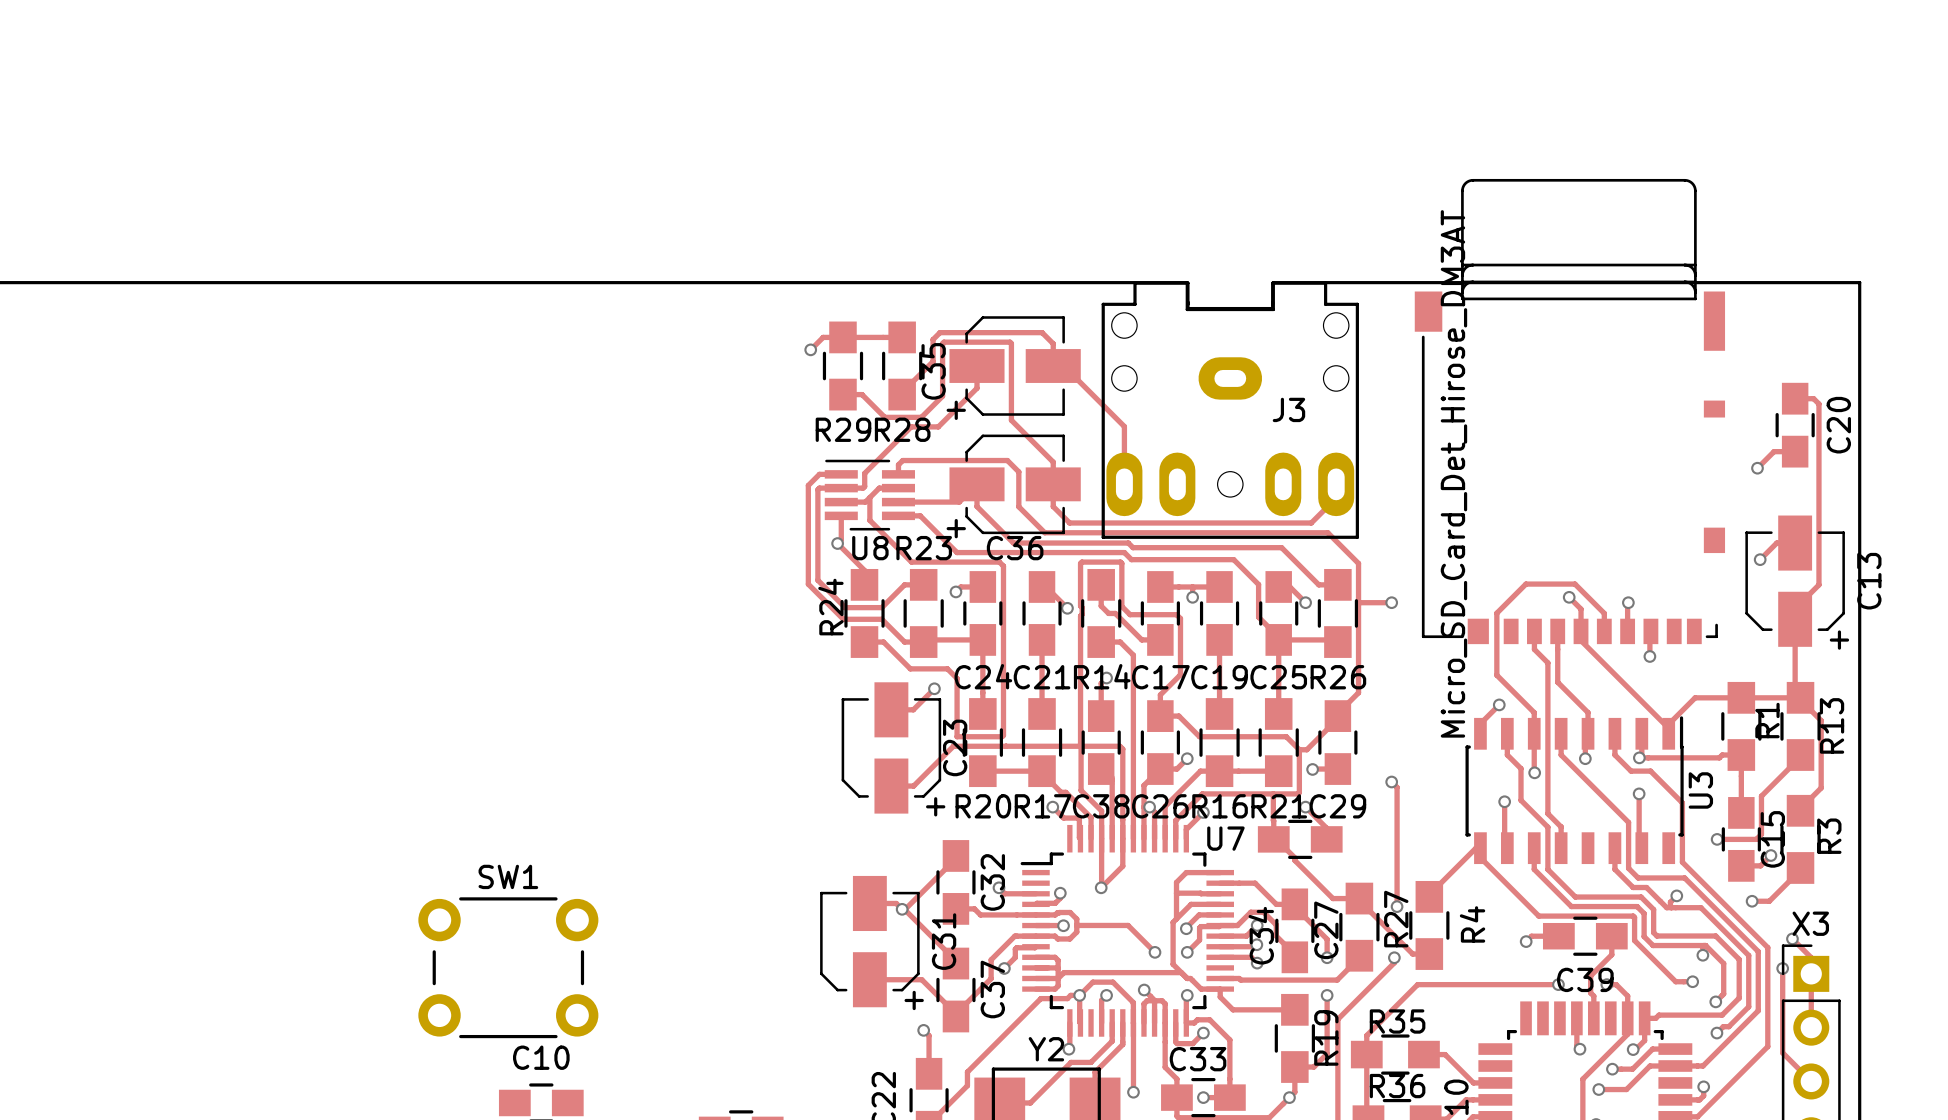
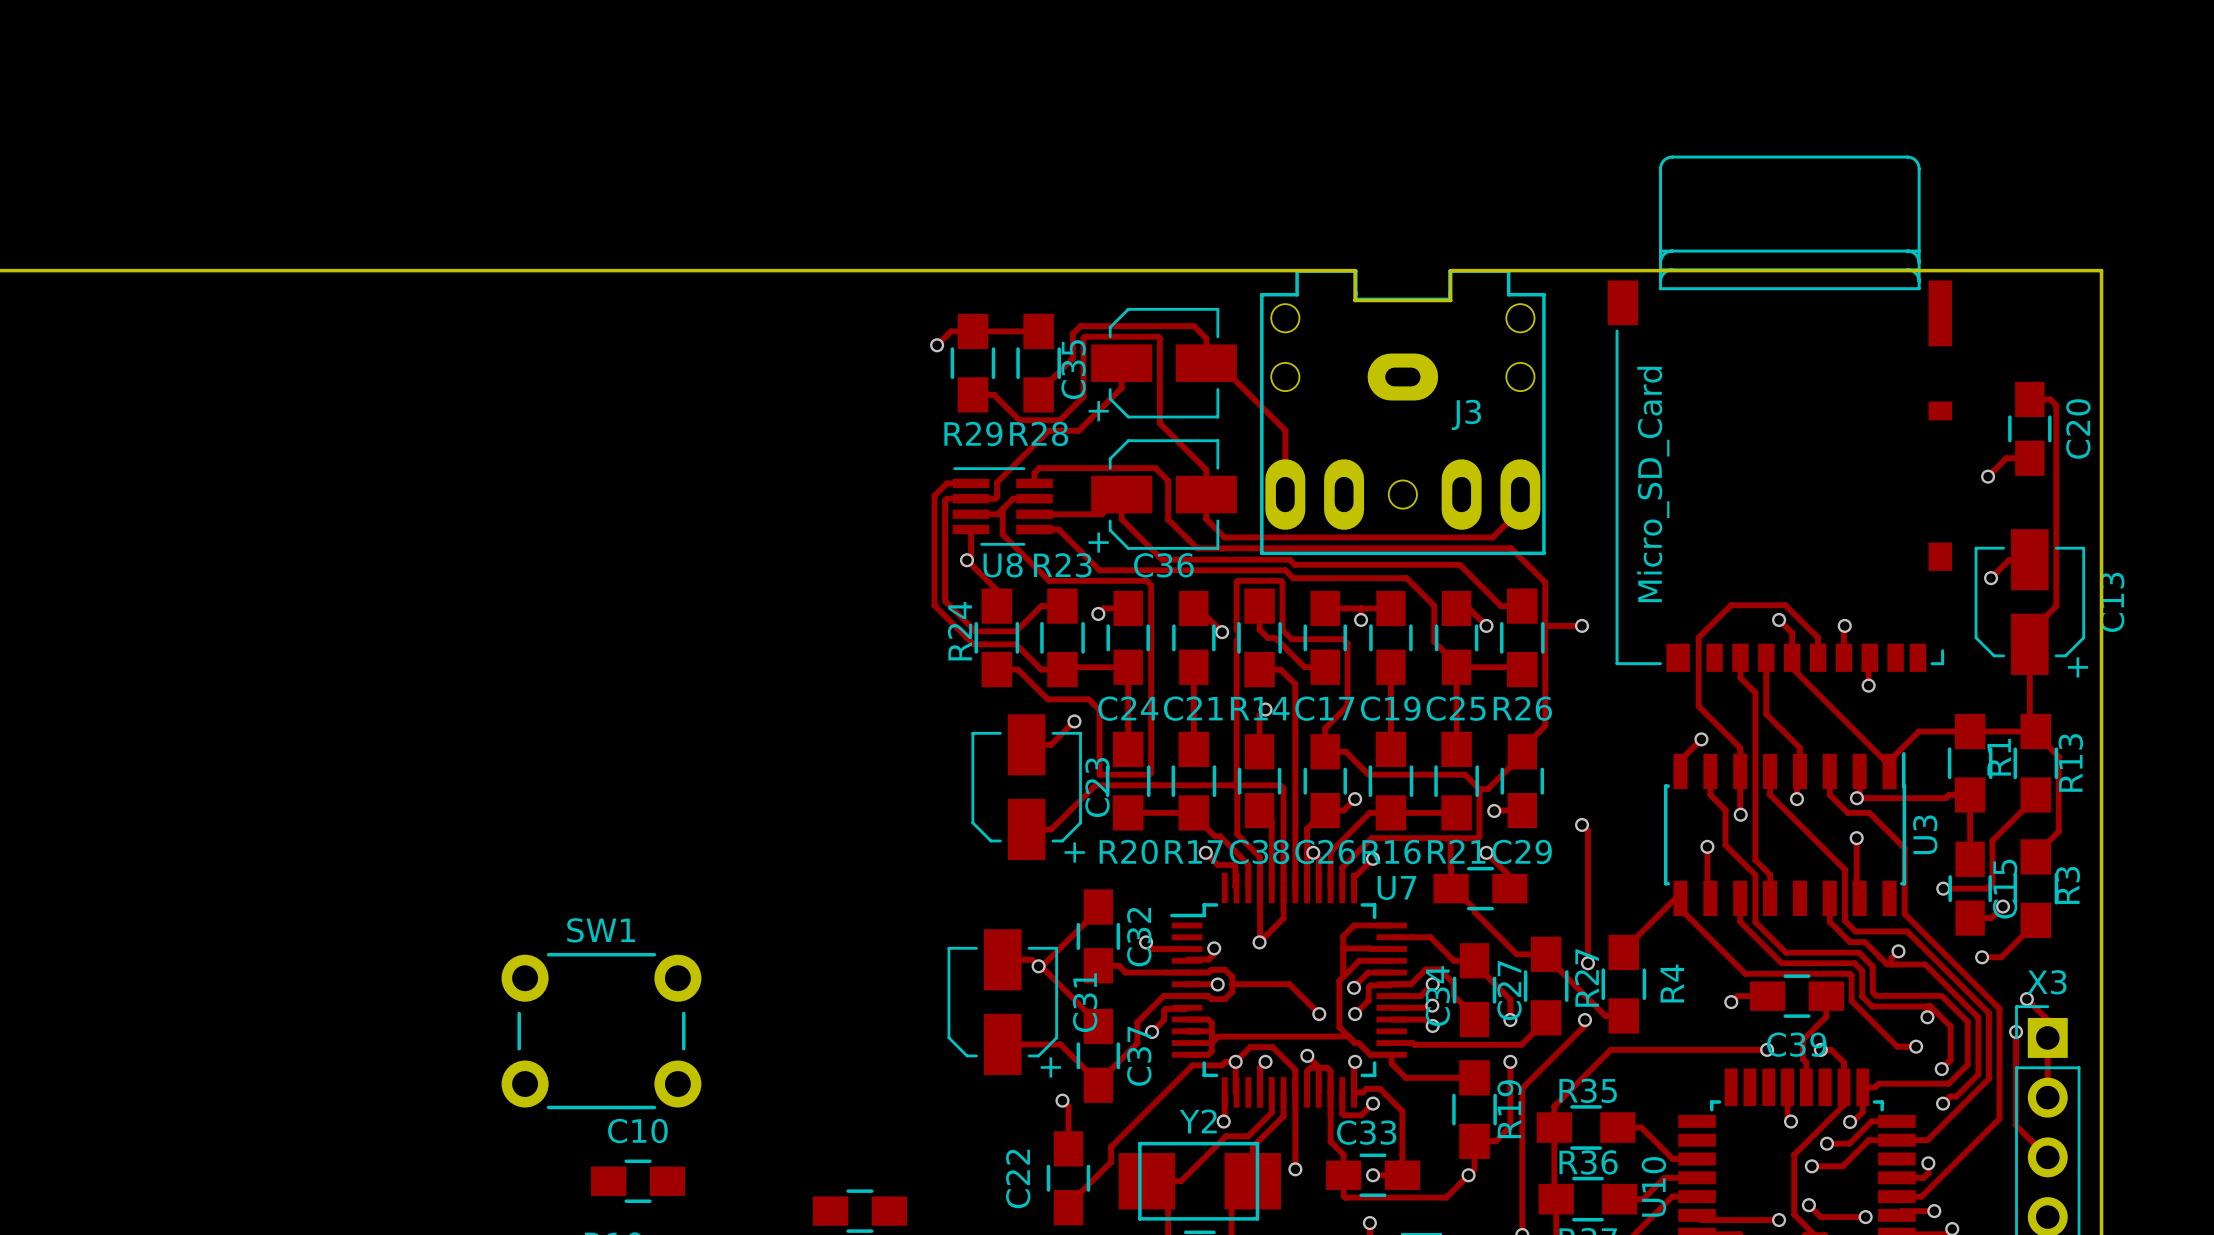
part value: Micro_SD_Card_Det_Hirose_DM3AT (1453, 473) -> Micro_SD_Card (1653, 484)

